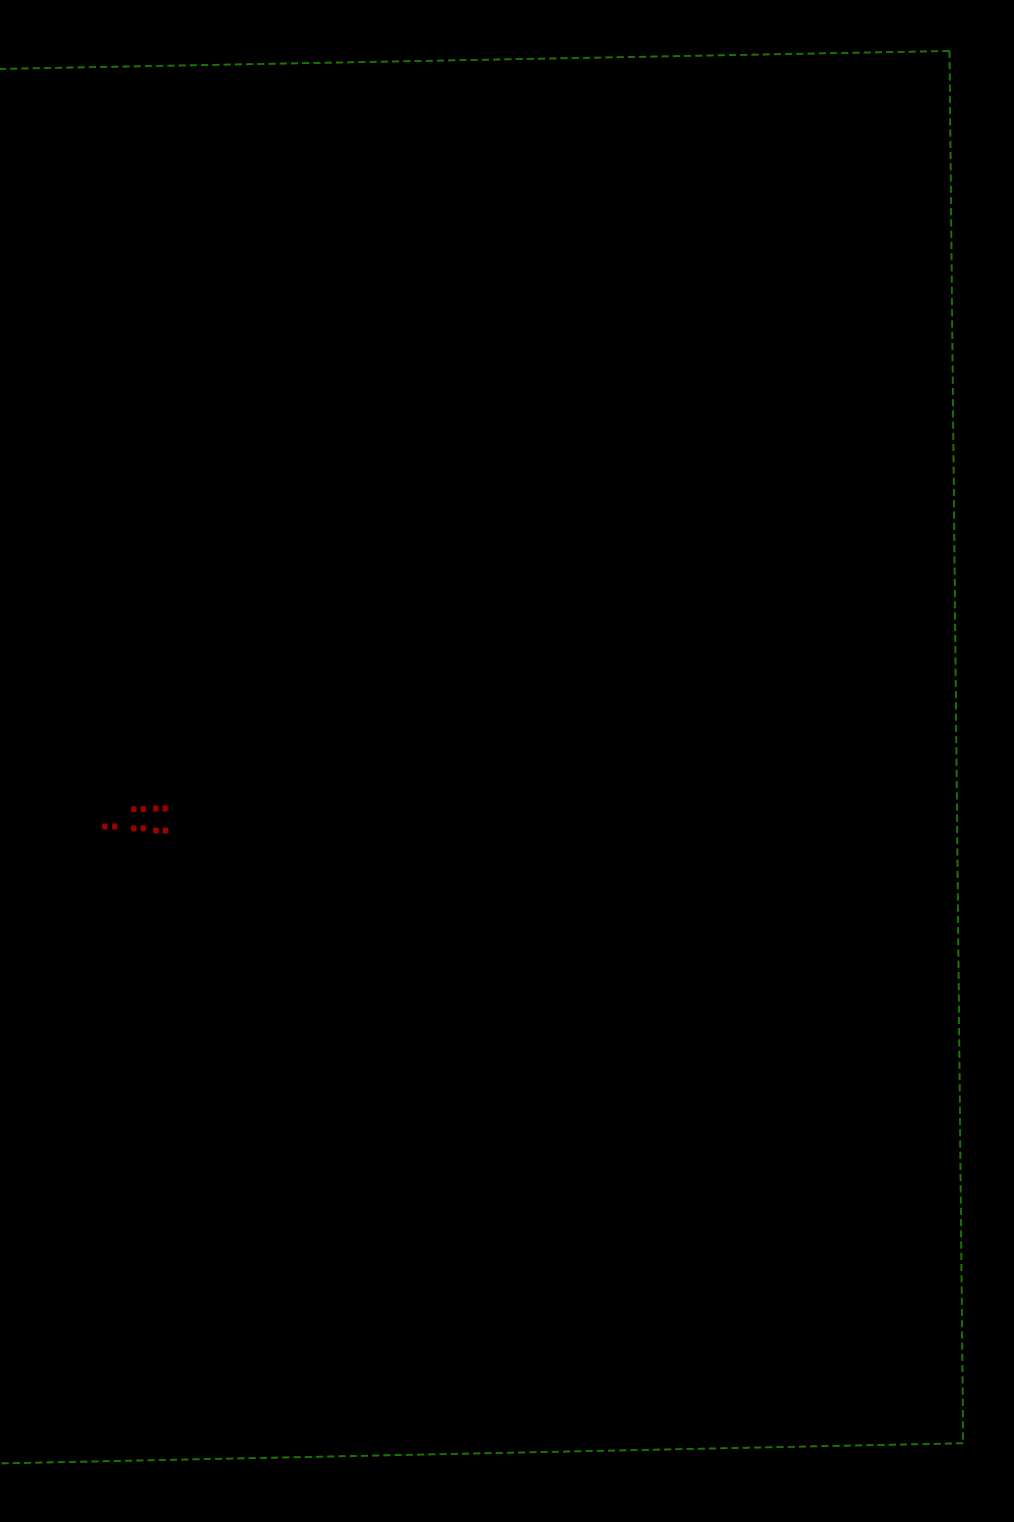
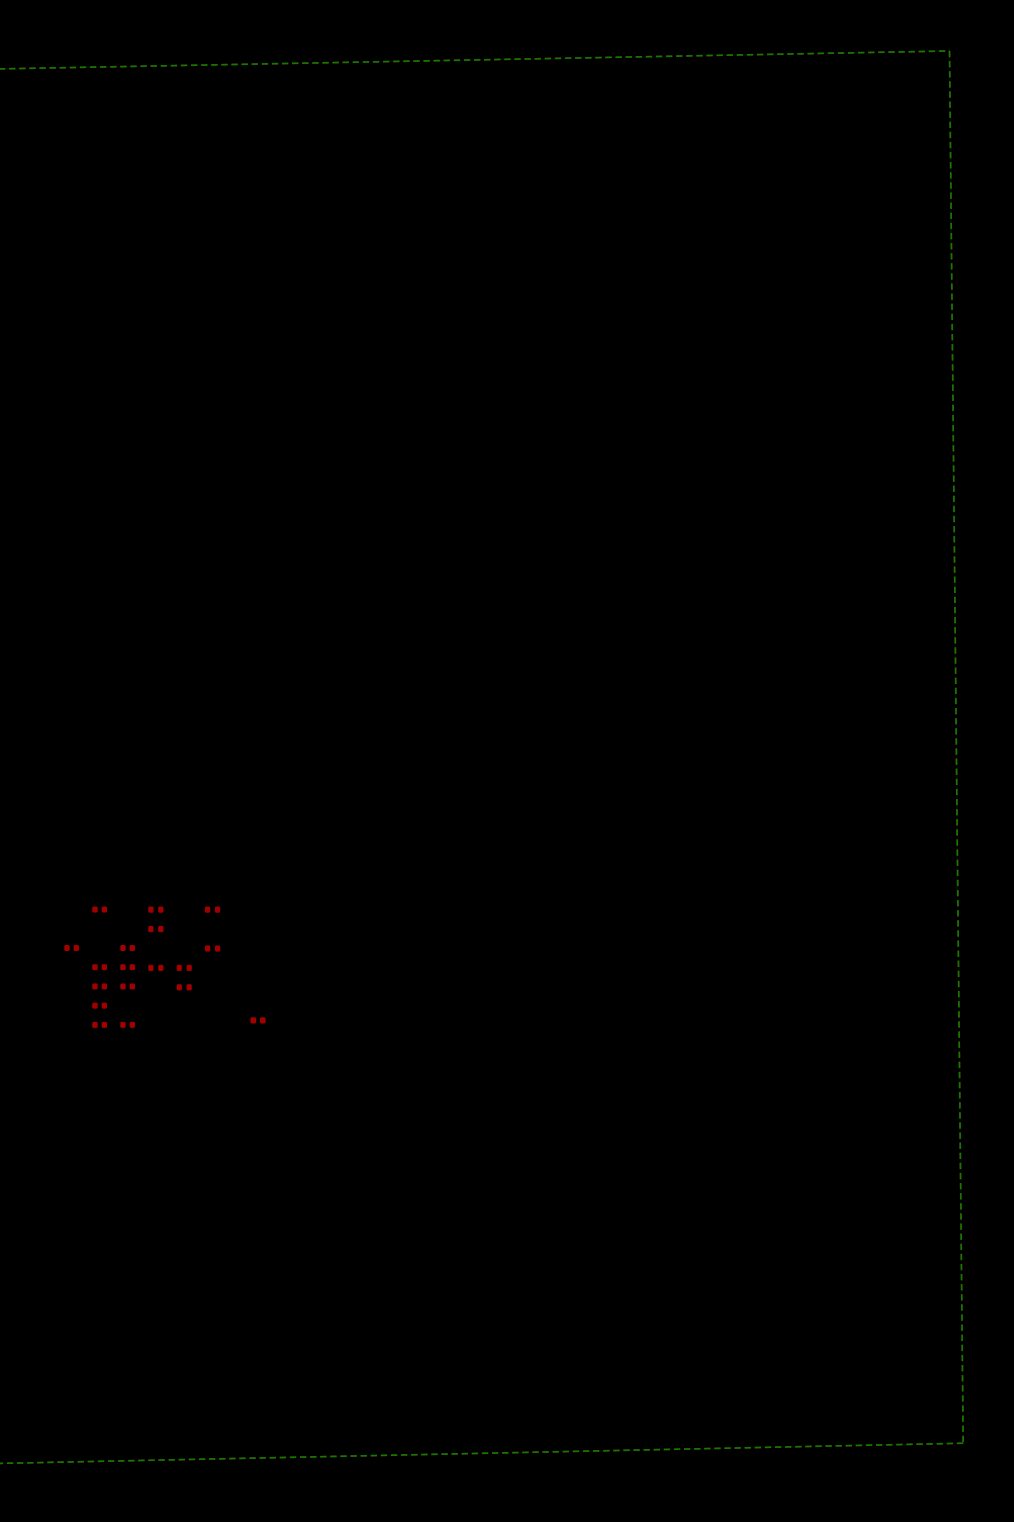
part: (160, 808) -> none
part: (138, 809) -> none
part: (109, 826) -> none
part: (138, 828) -> none
part: (160, 830) -> none
part: none -> (99, 909)
part: none -> (155, 909)
part: none -> (212, 909)
part: none -> (155, 929)
part: none -> (71, 947)
part: none -> (127, 947)
part: none -> (212, 948)
part: none -> (99, 967)
part: none -> (127, 967)
part: none -> (155, 967)
part: none -> (184, 967)
part: none -> (99, 986)
part: none -> (127, 986)
part: none -> (184, 987)
part: none -> (99, 1005)
part: none -> (258, 1020)
part: none -> (99, 1024)
part: none -> (127, 1024)

